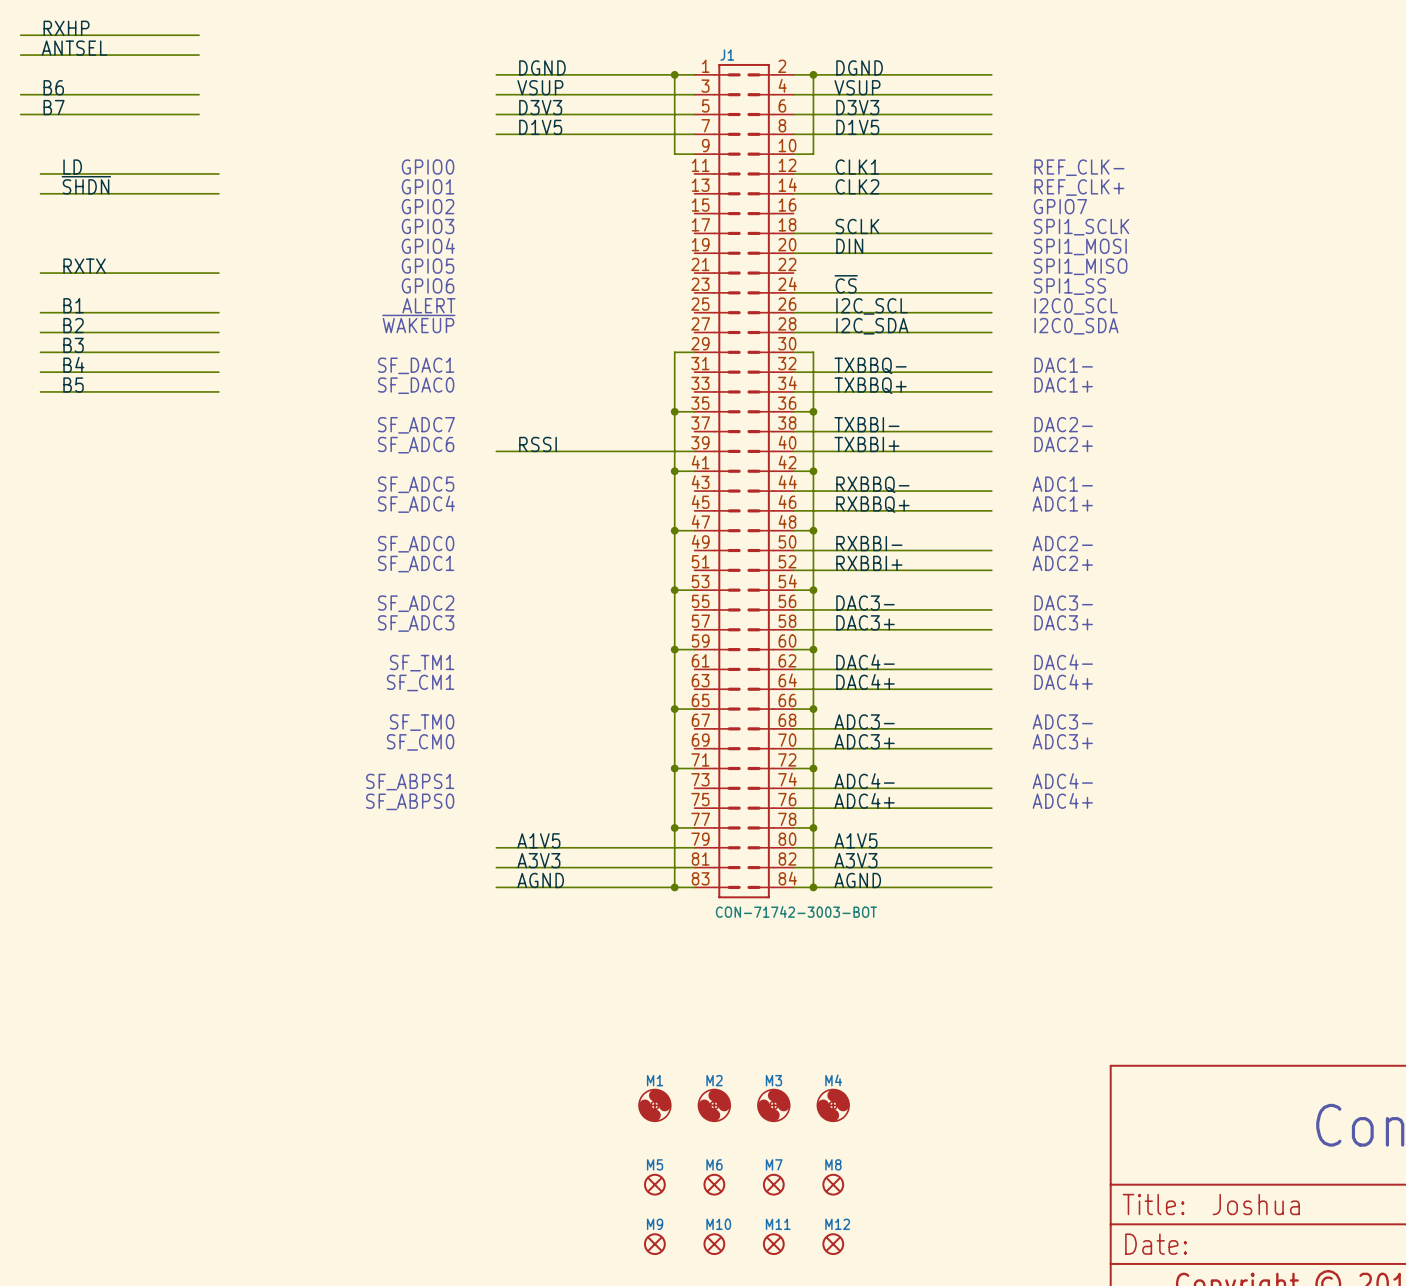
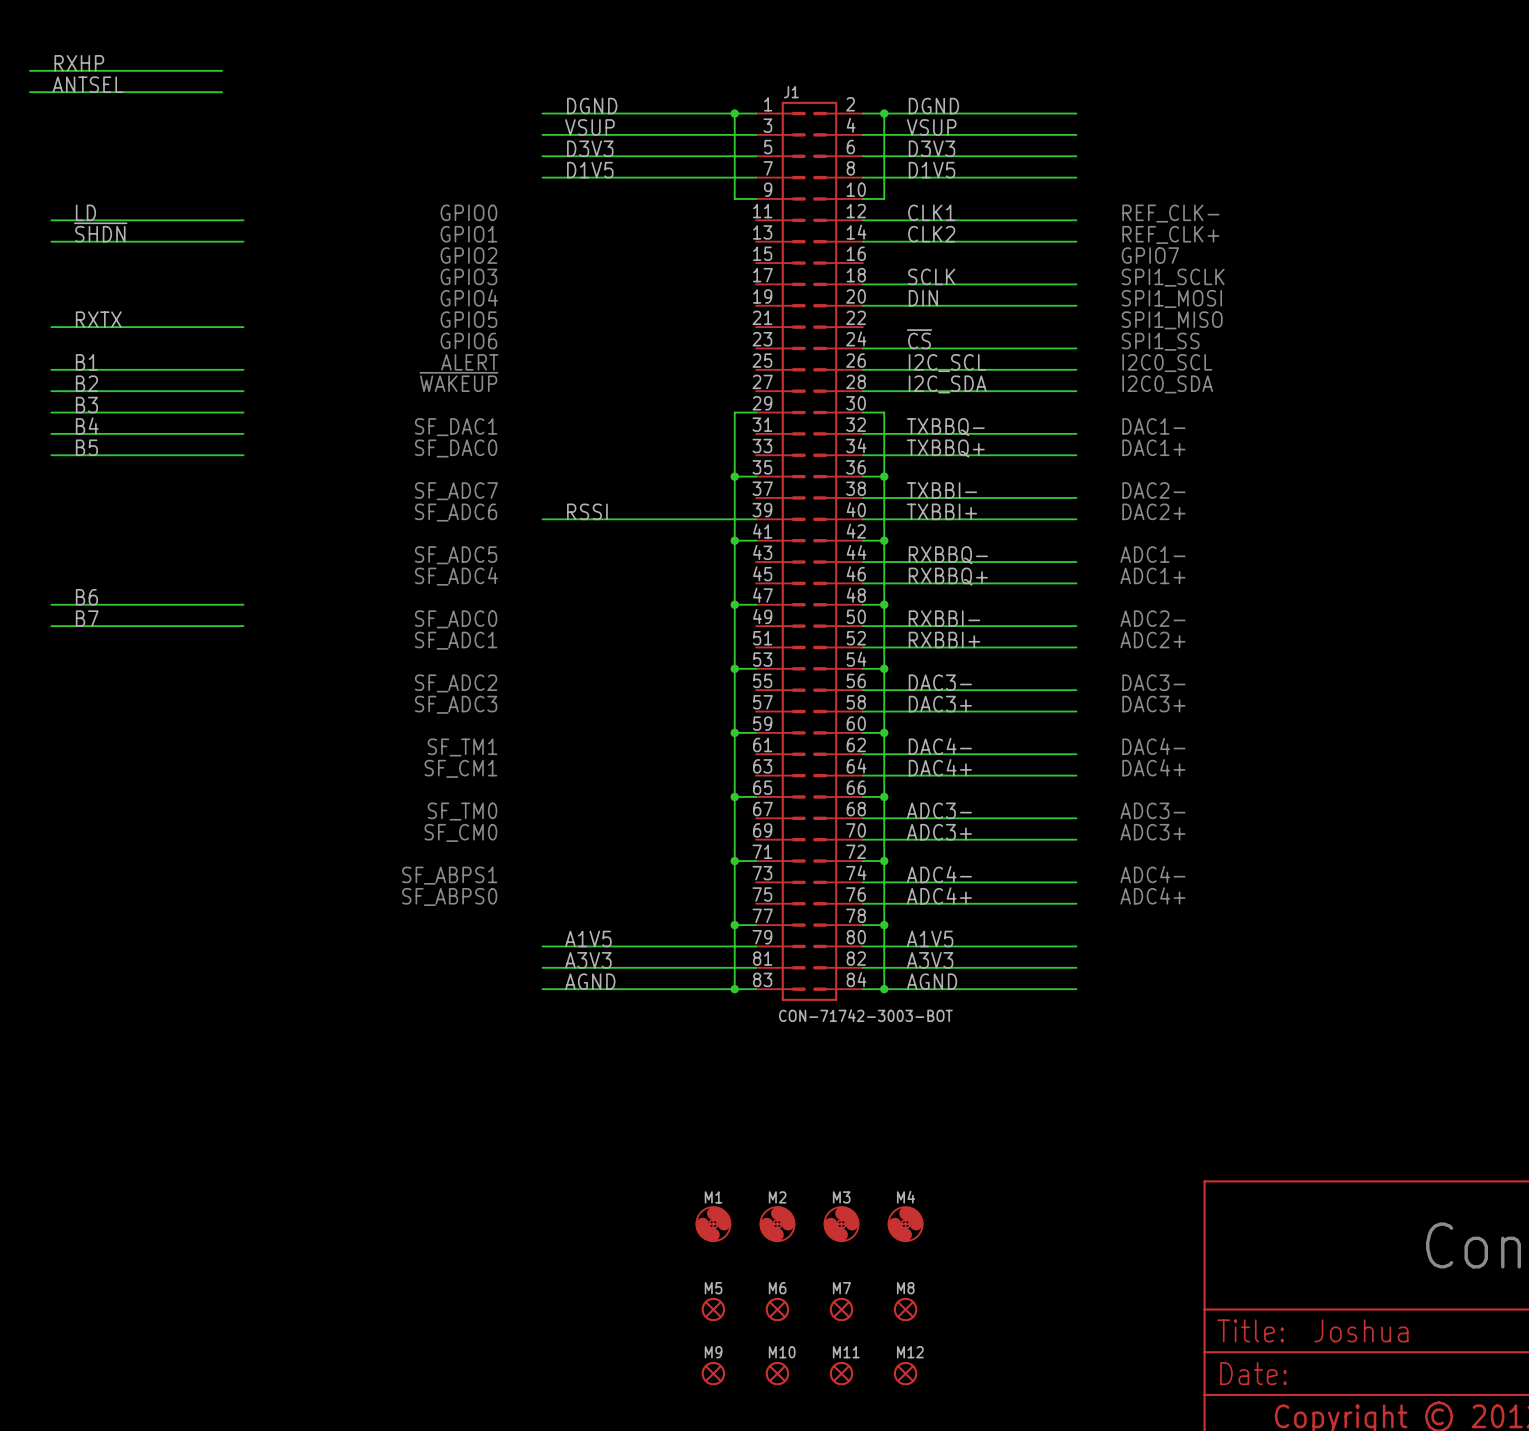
label: B6 (53, 87) -> none
wire: (20, 94) (199, 94) -> none
label: B7 (54, 107) -> none
wire: (20, 114) (199, 114) -> none
label: none -> B6 (86, 597)
wire: none -> (51, 604) (243, 604)
label: none -> B7 (87, 618)
wire: none -> (51, 626) (243, 626)

